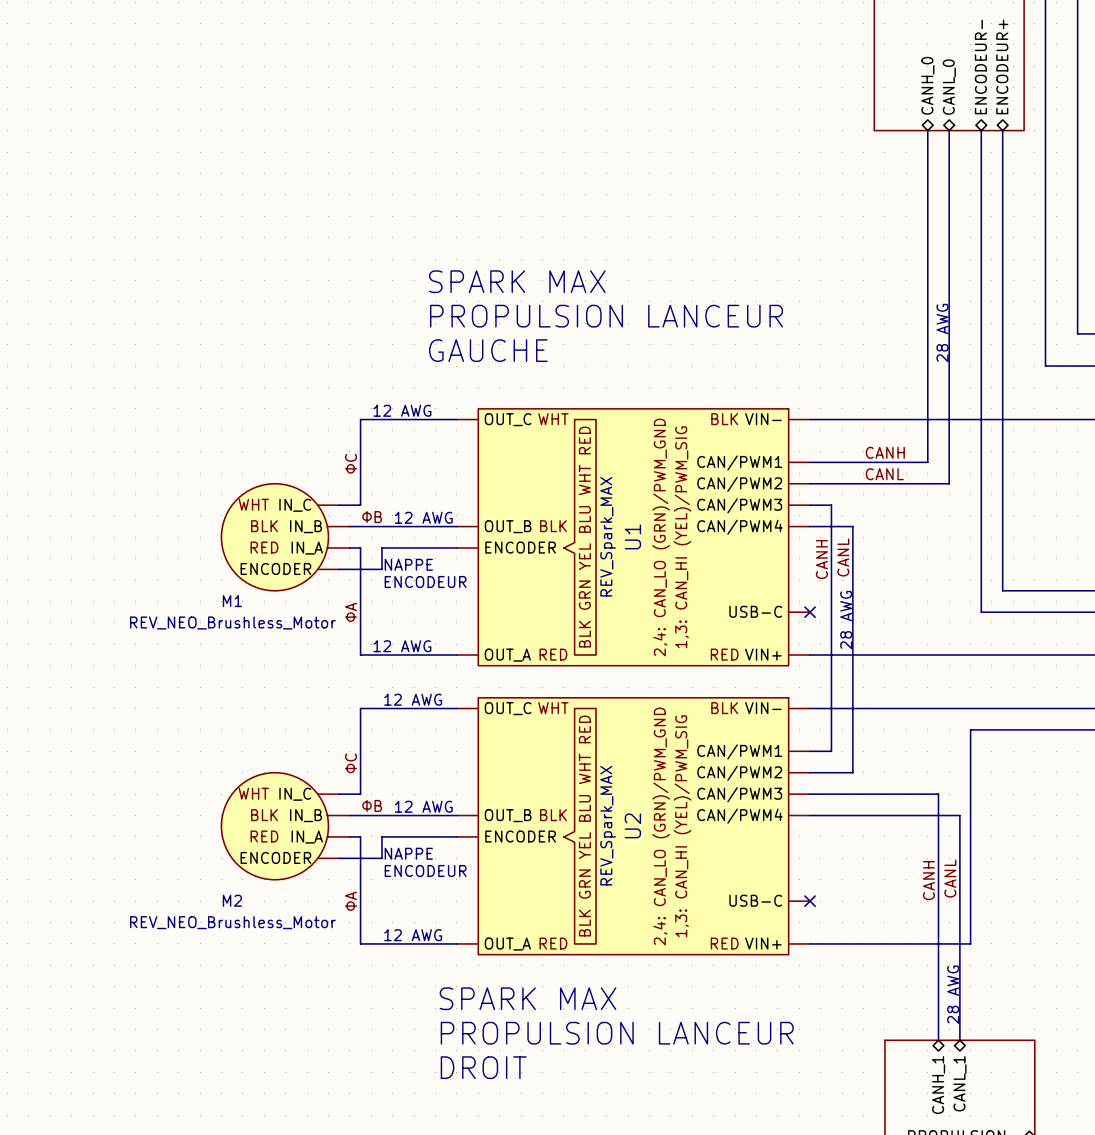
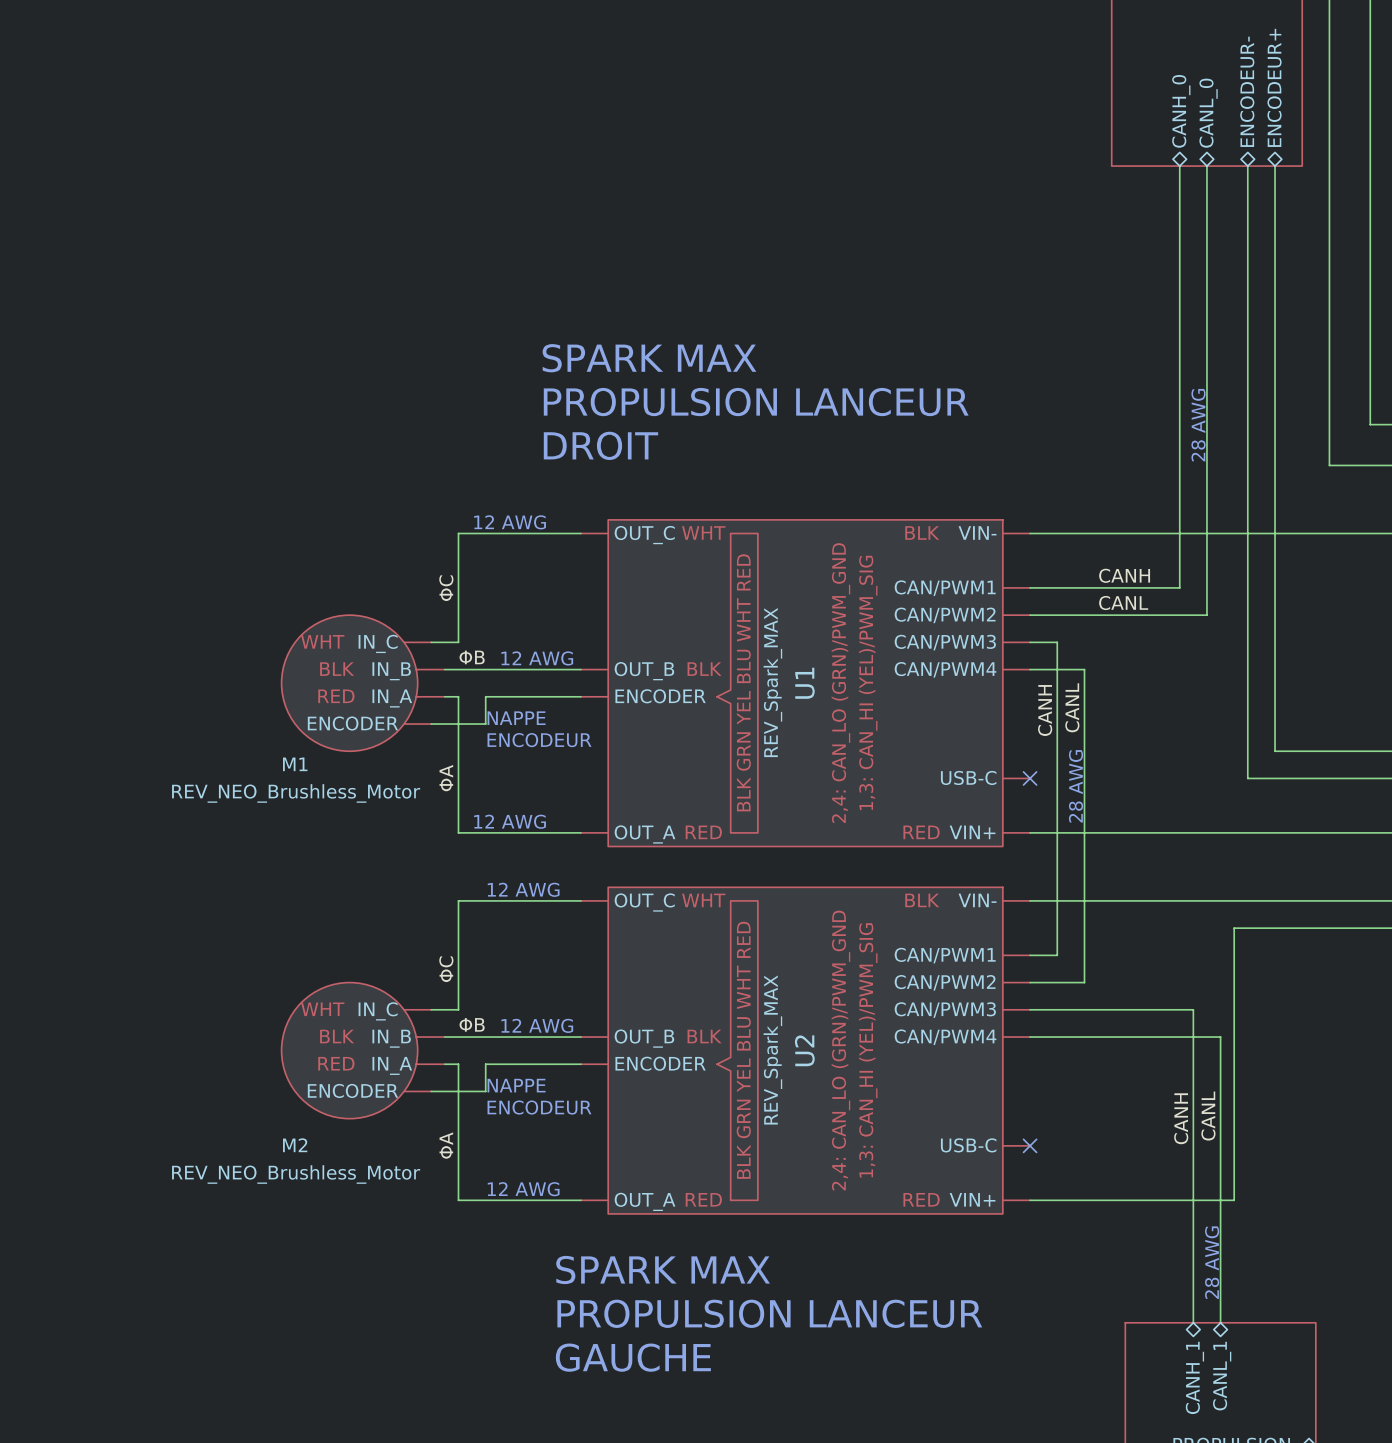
text: GAUCHE (488, 350) -> DROIT (600, 445)
text: DROIT (483, 1067) -> GAUCHE (633, 1357)

